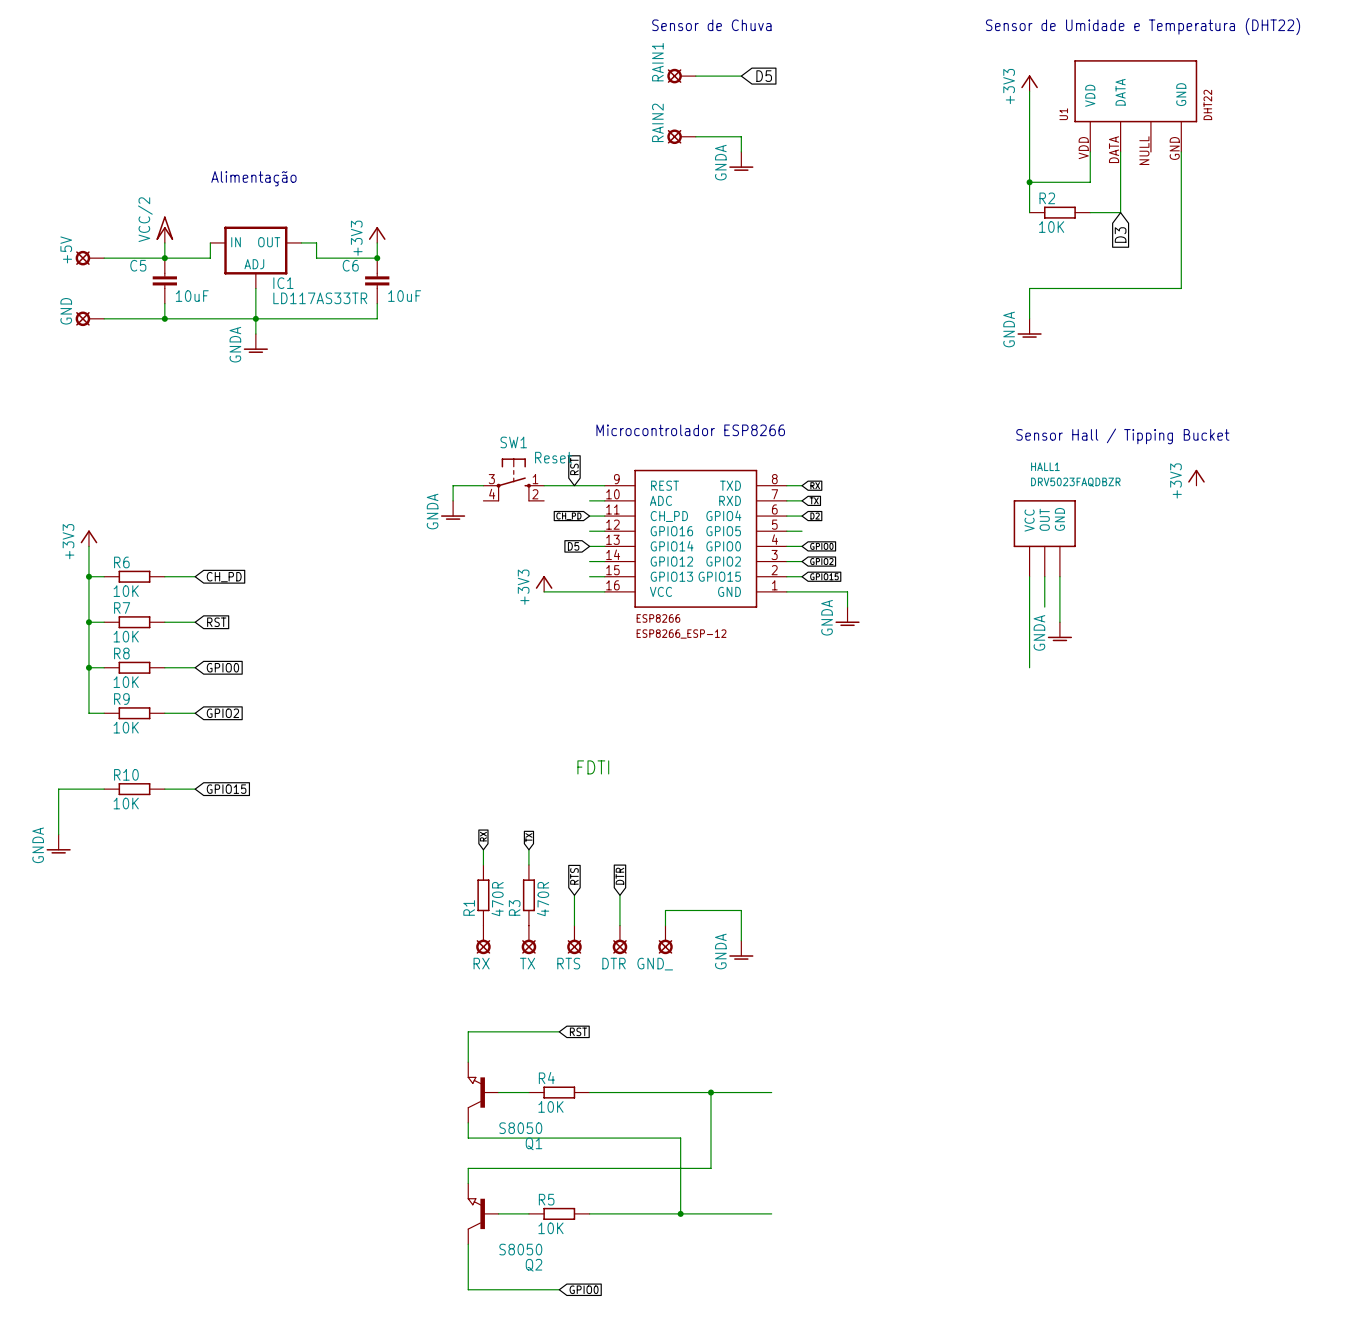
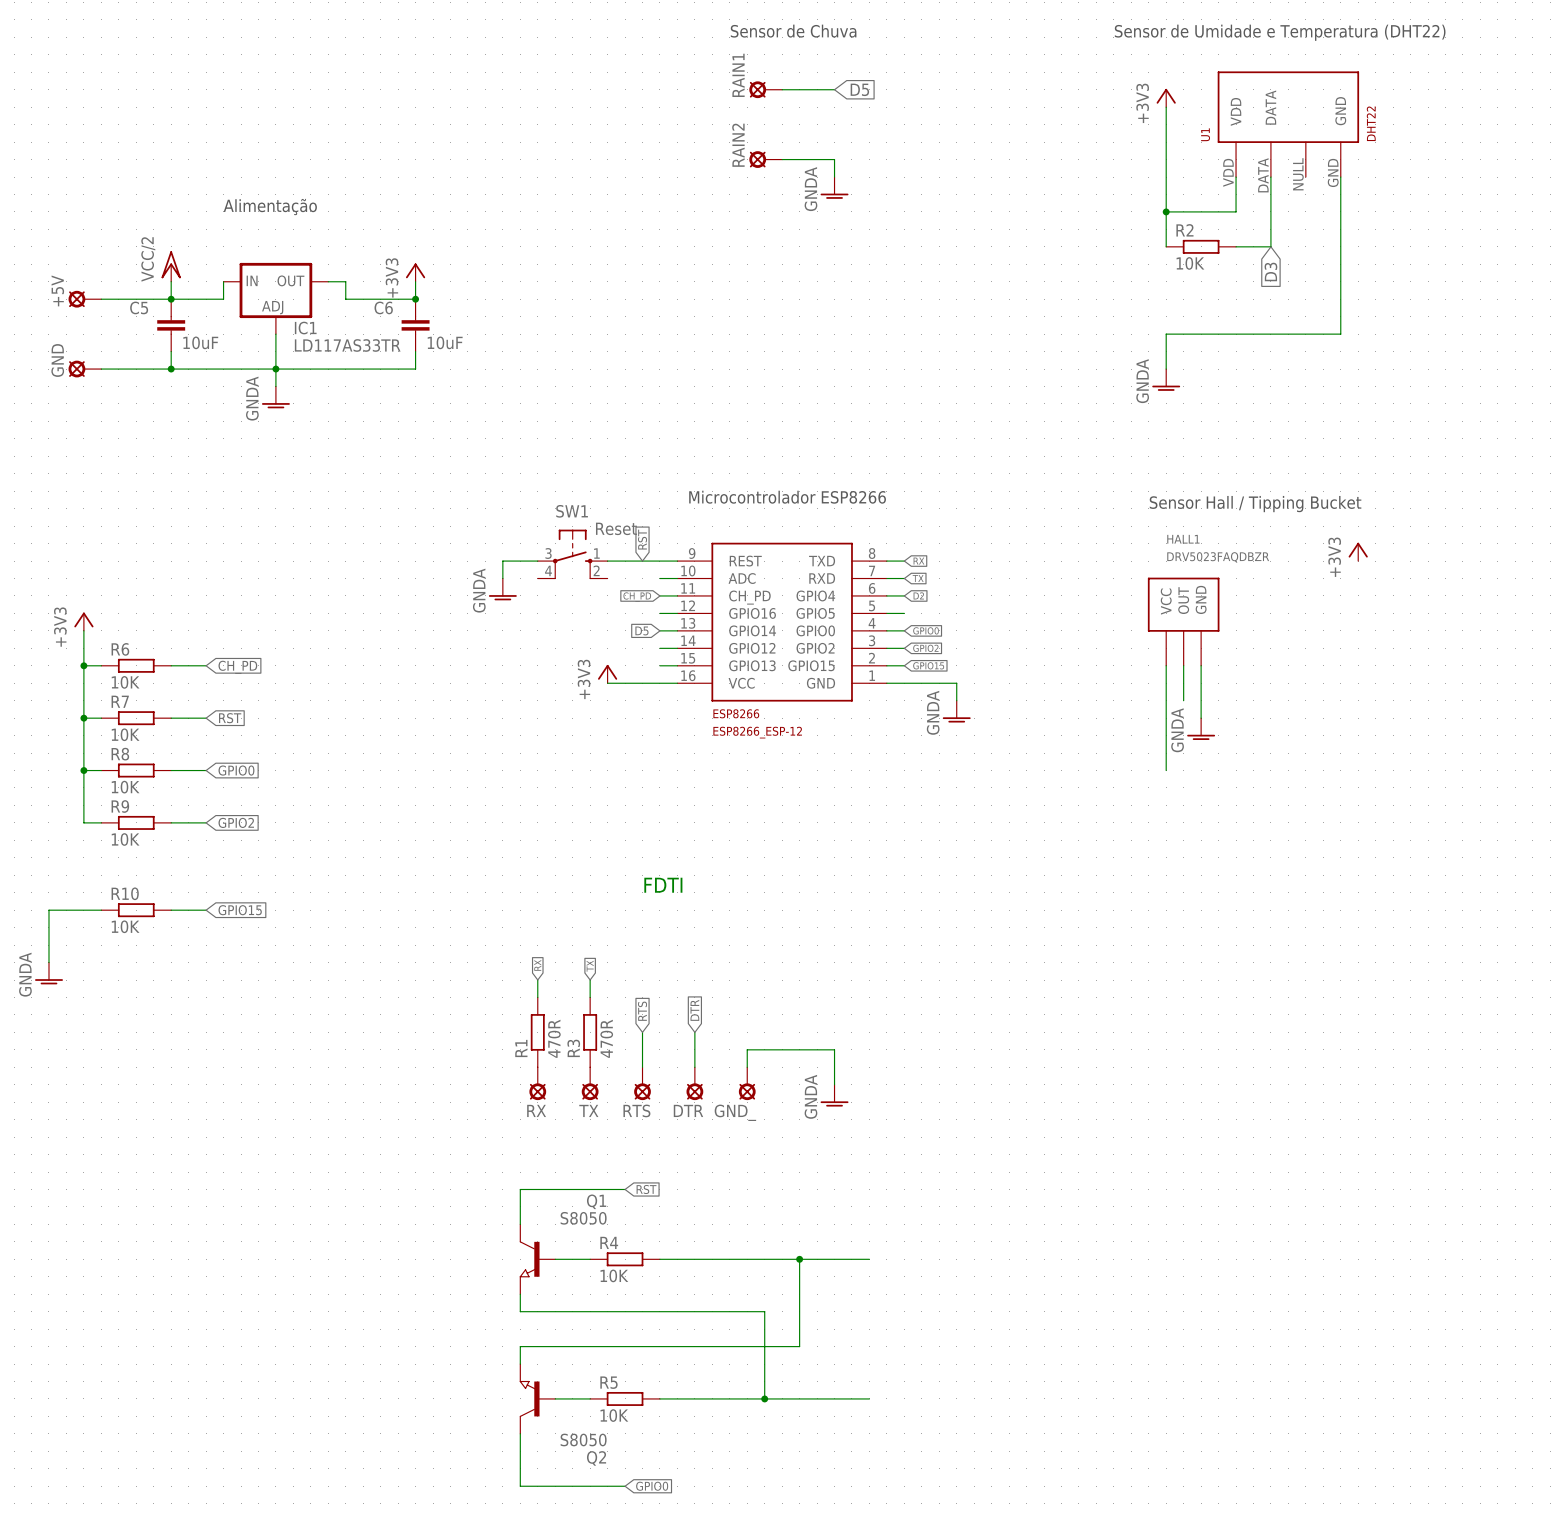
Q1 flip: as is (476, 1092) -> up-down (529, 1259)

